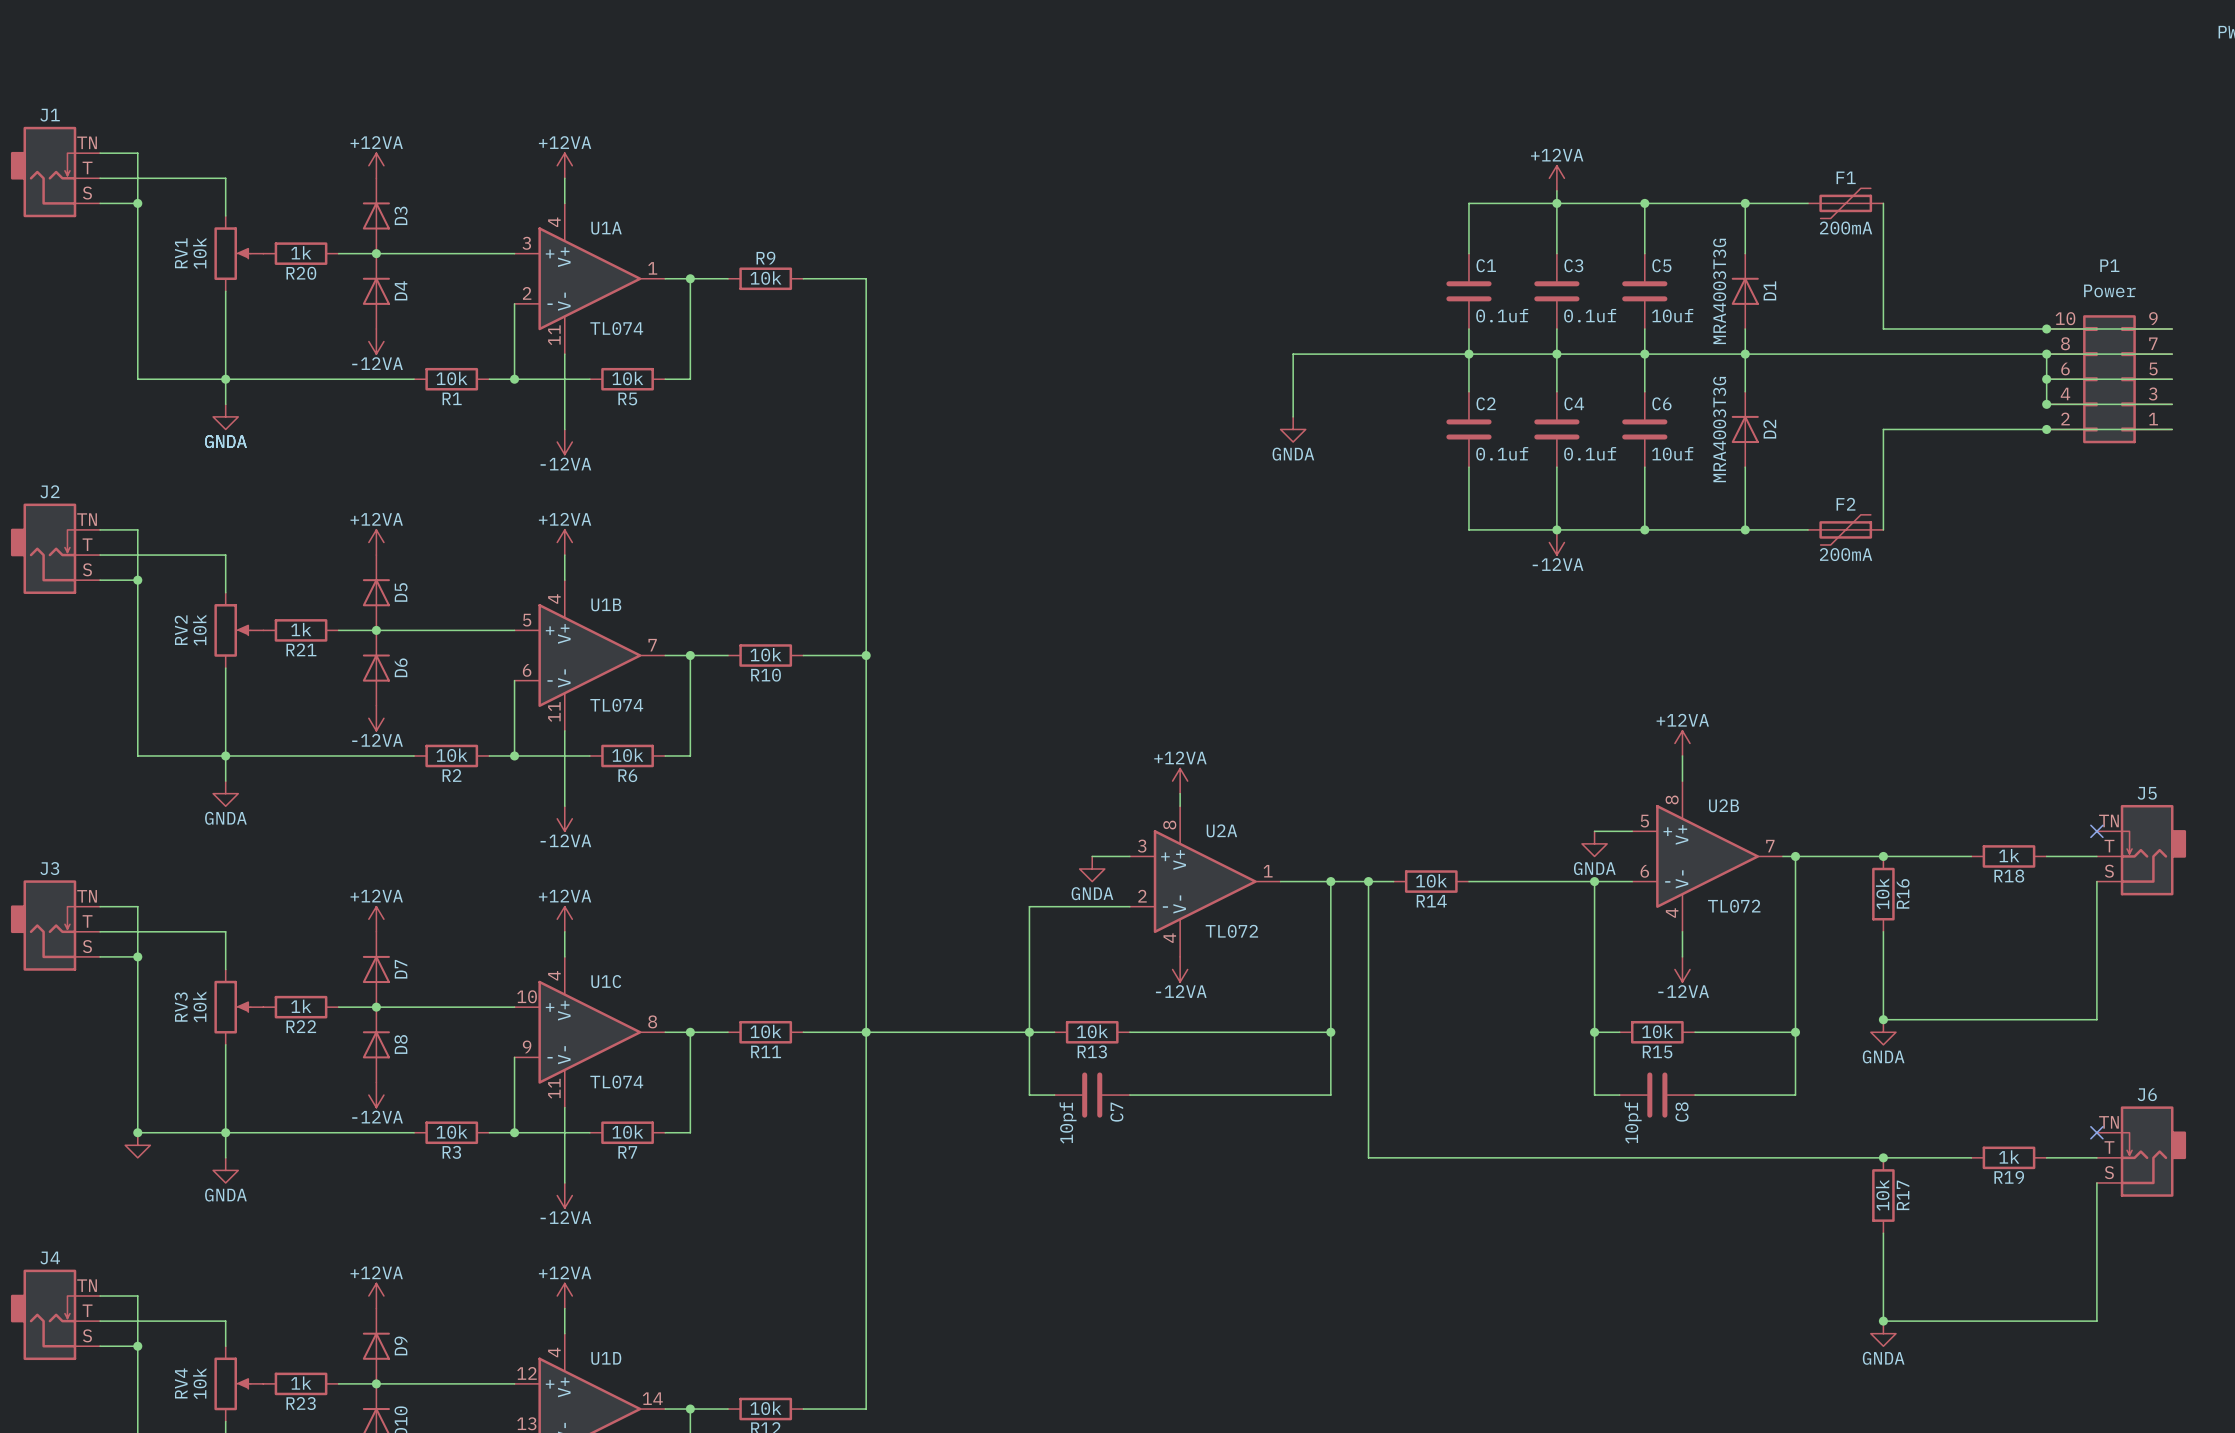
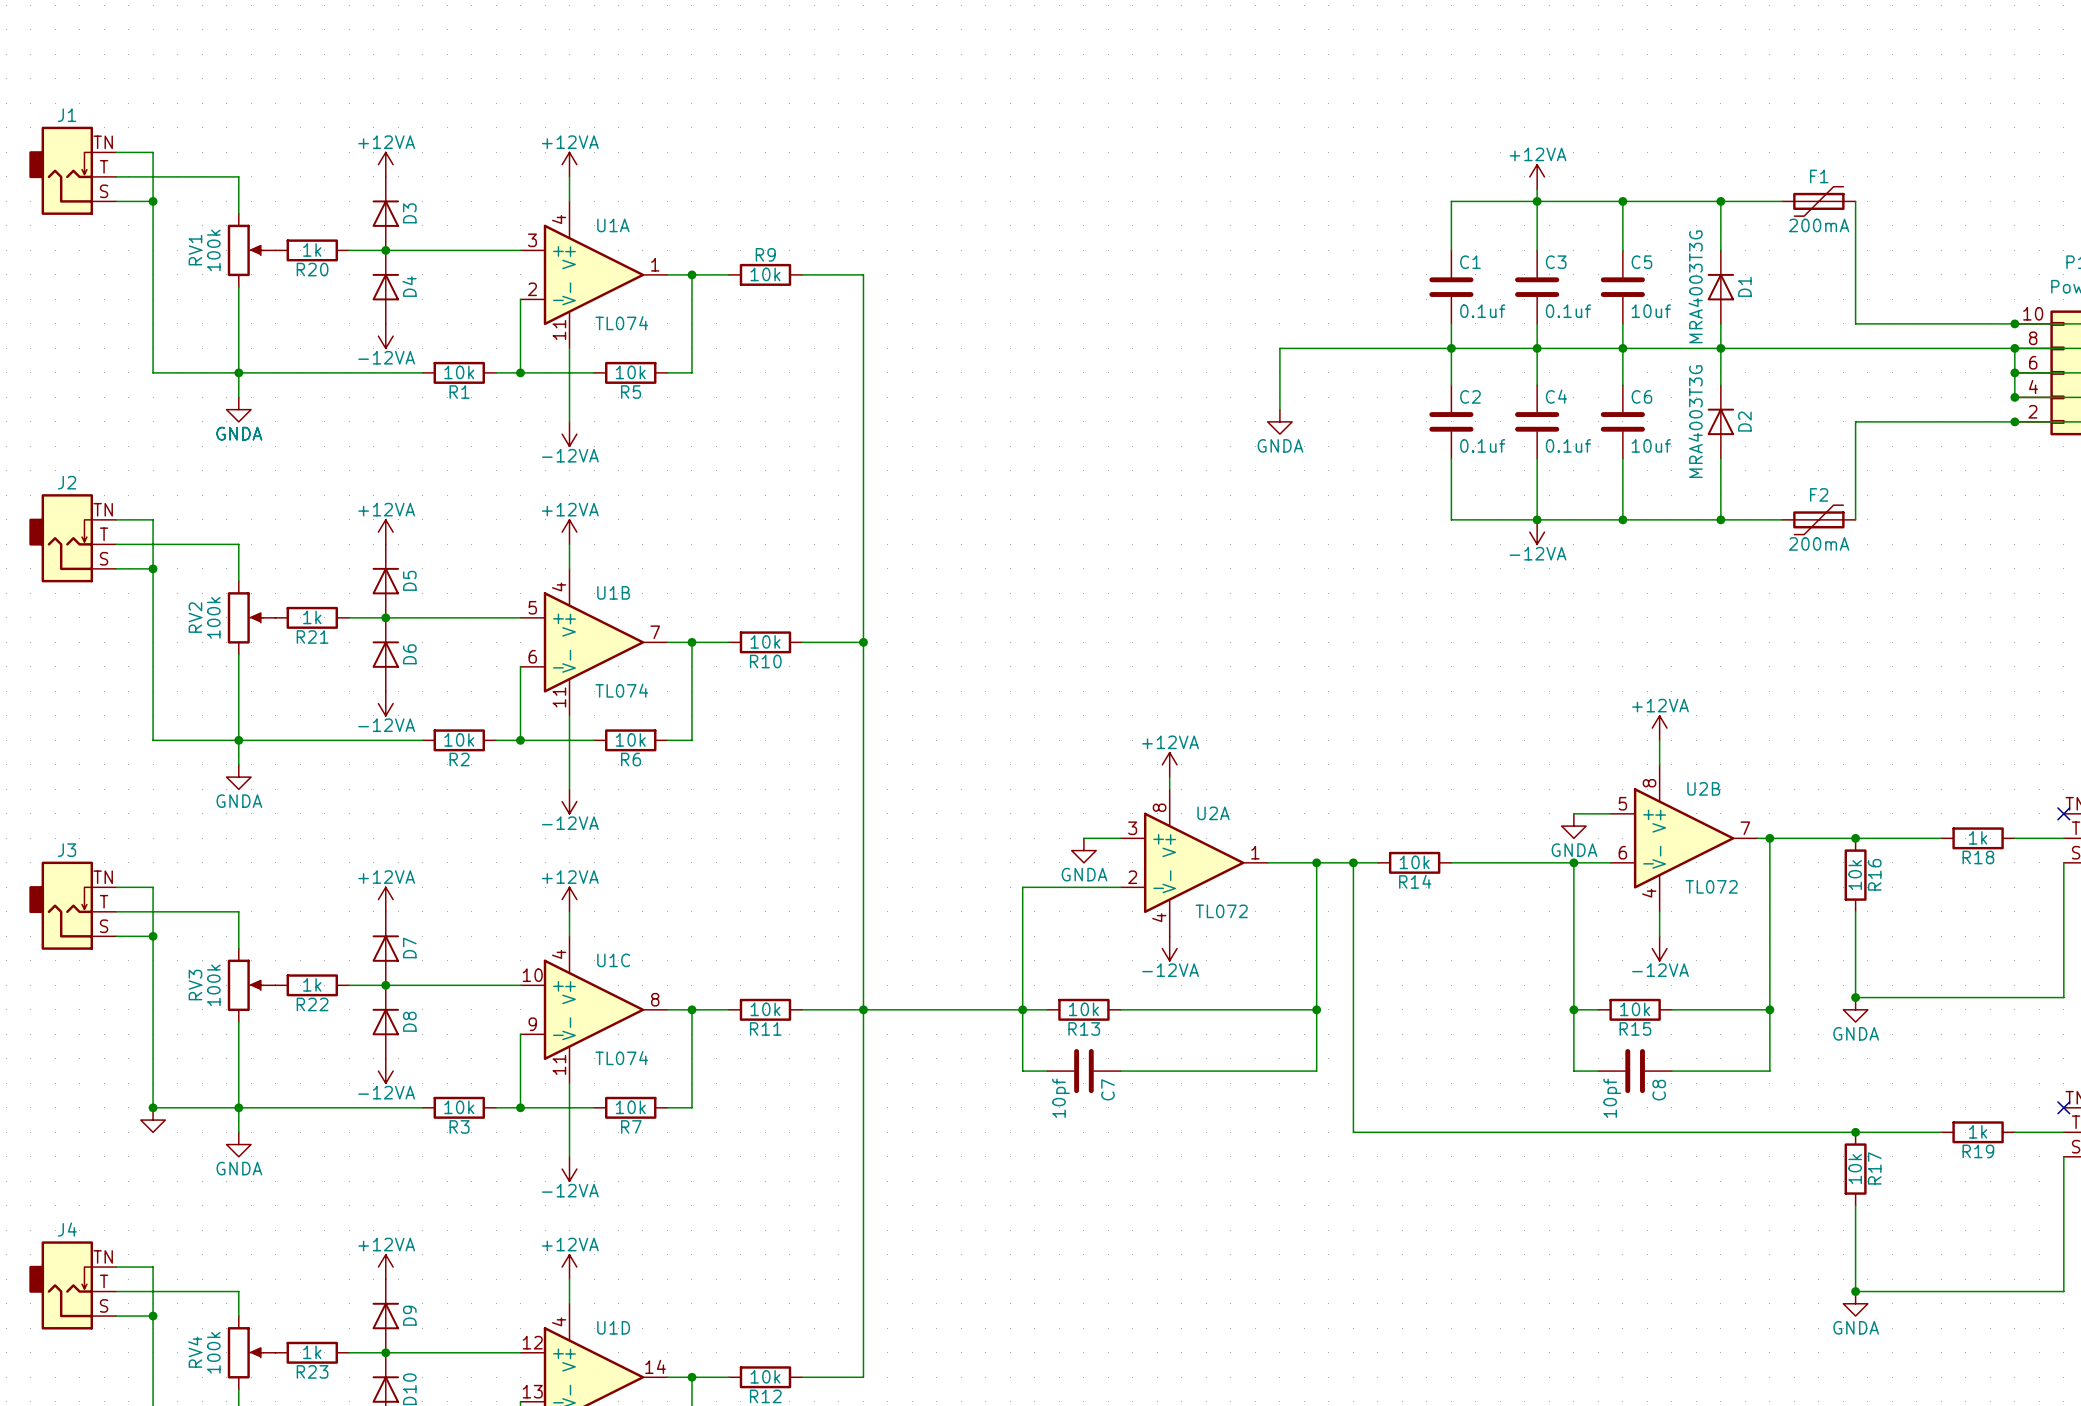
RV1 value: 10k (199, 253) -> 100k (213, 250)
RV2 value: 10k (199, 630) -> 100k (213, 617)
RV3 value: 10k (199, 1006) -> 100k (213, 985)
RV4 value: 10k (199, 1383) -> 100k (213, 1352)

